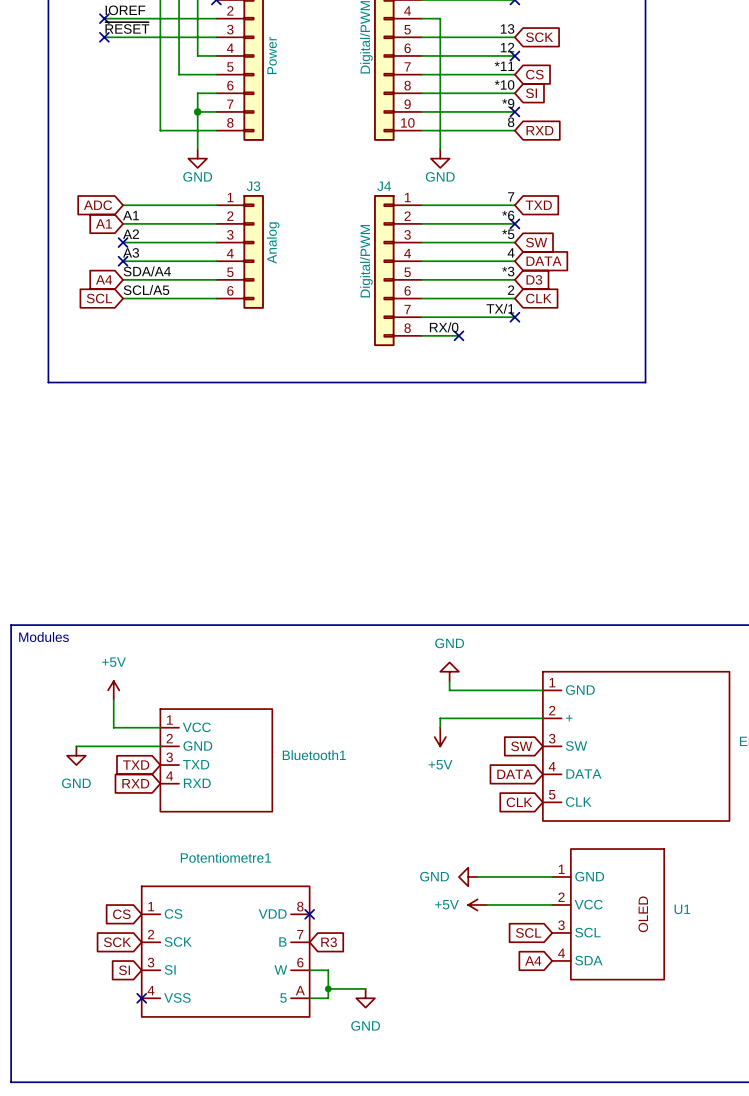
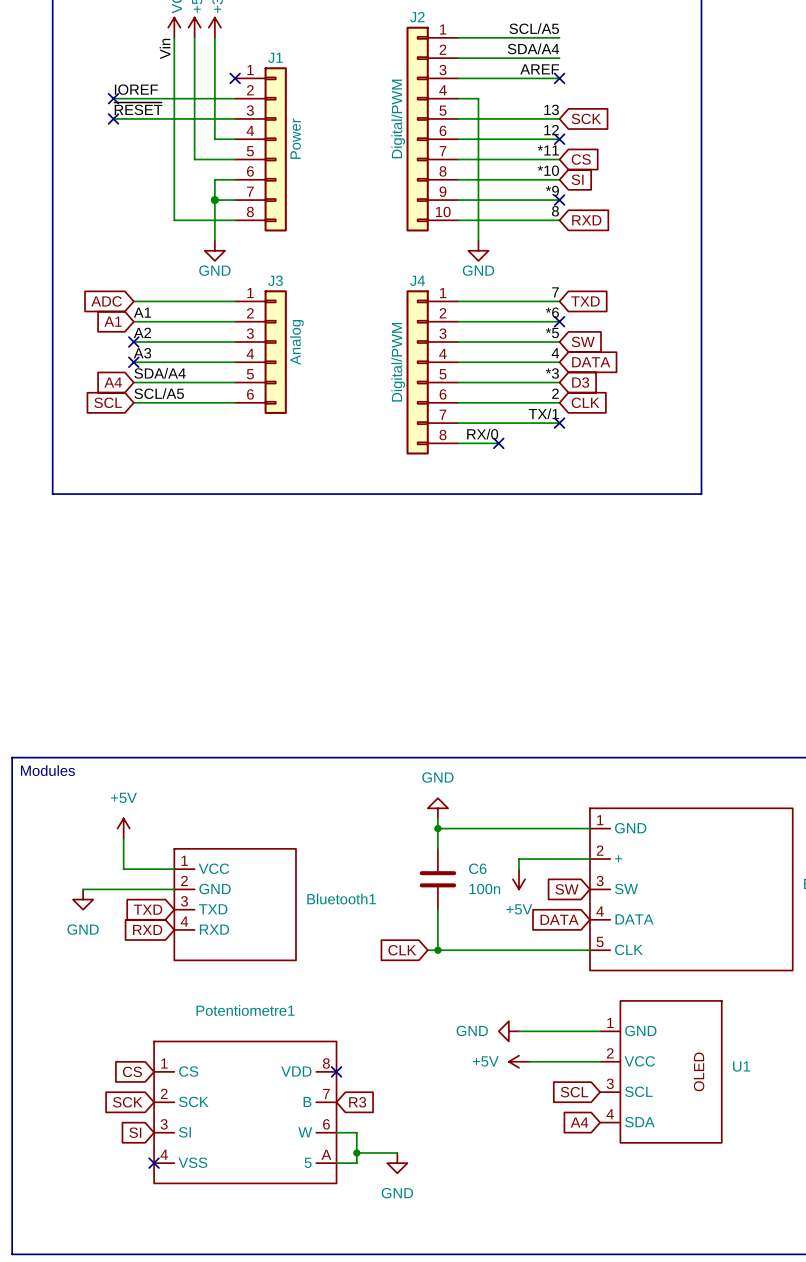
power symbol position: GND (449, 671) -> GND (437, 808)
wire: none -> (437, 818) (437, 848)
wire: (449, 681) (449, 690) -> (437, 828) (488, 828)
junction: none -> (437, 828)
wire: (477, 718) (440, 718) (440, 727) -> (519, 859) (519, 869)
C6: none -> 100n (437, 879)
power symbol position: +5V (440, 737) -> +5V (519, 879)
wire: none -> (437, 909) (437, 950)
wire: none -> (427, 950) (589, 950)
junction: none -> (437, 950)
global label position: CLK (519, 802) -> CLK (402, 950)

